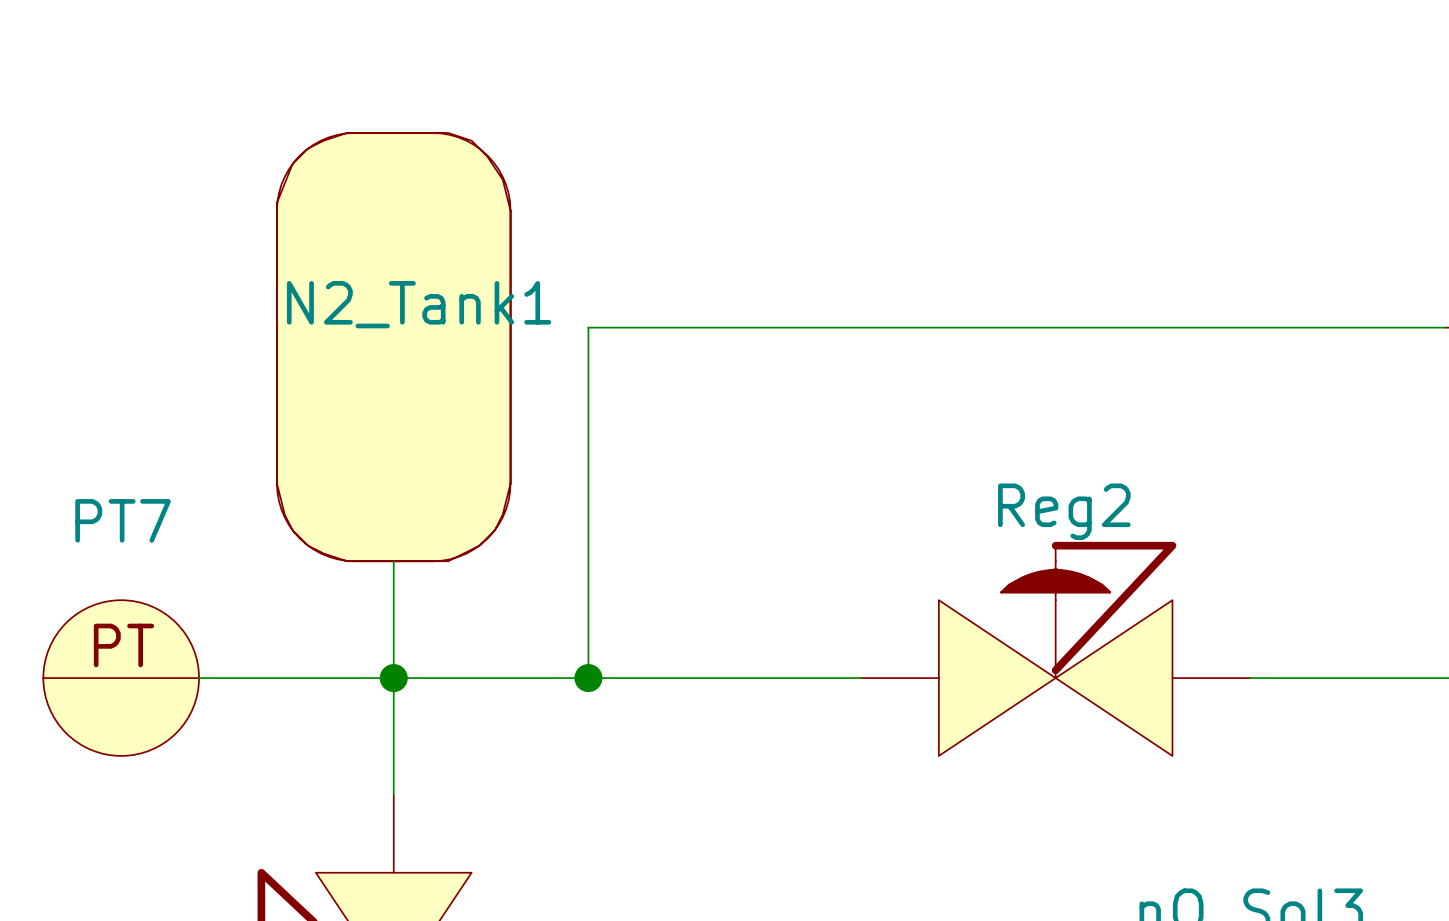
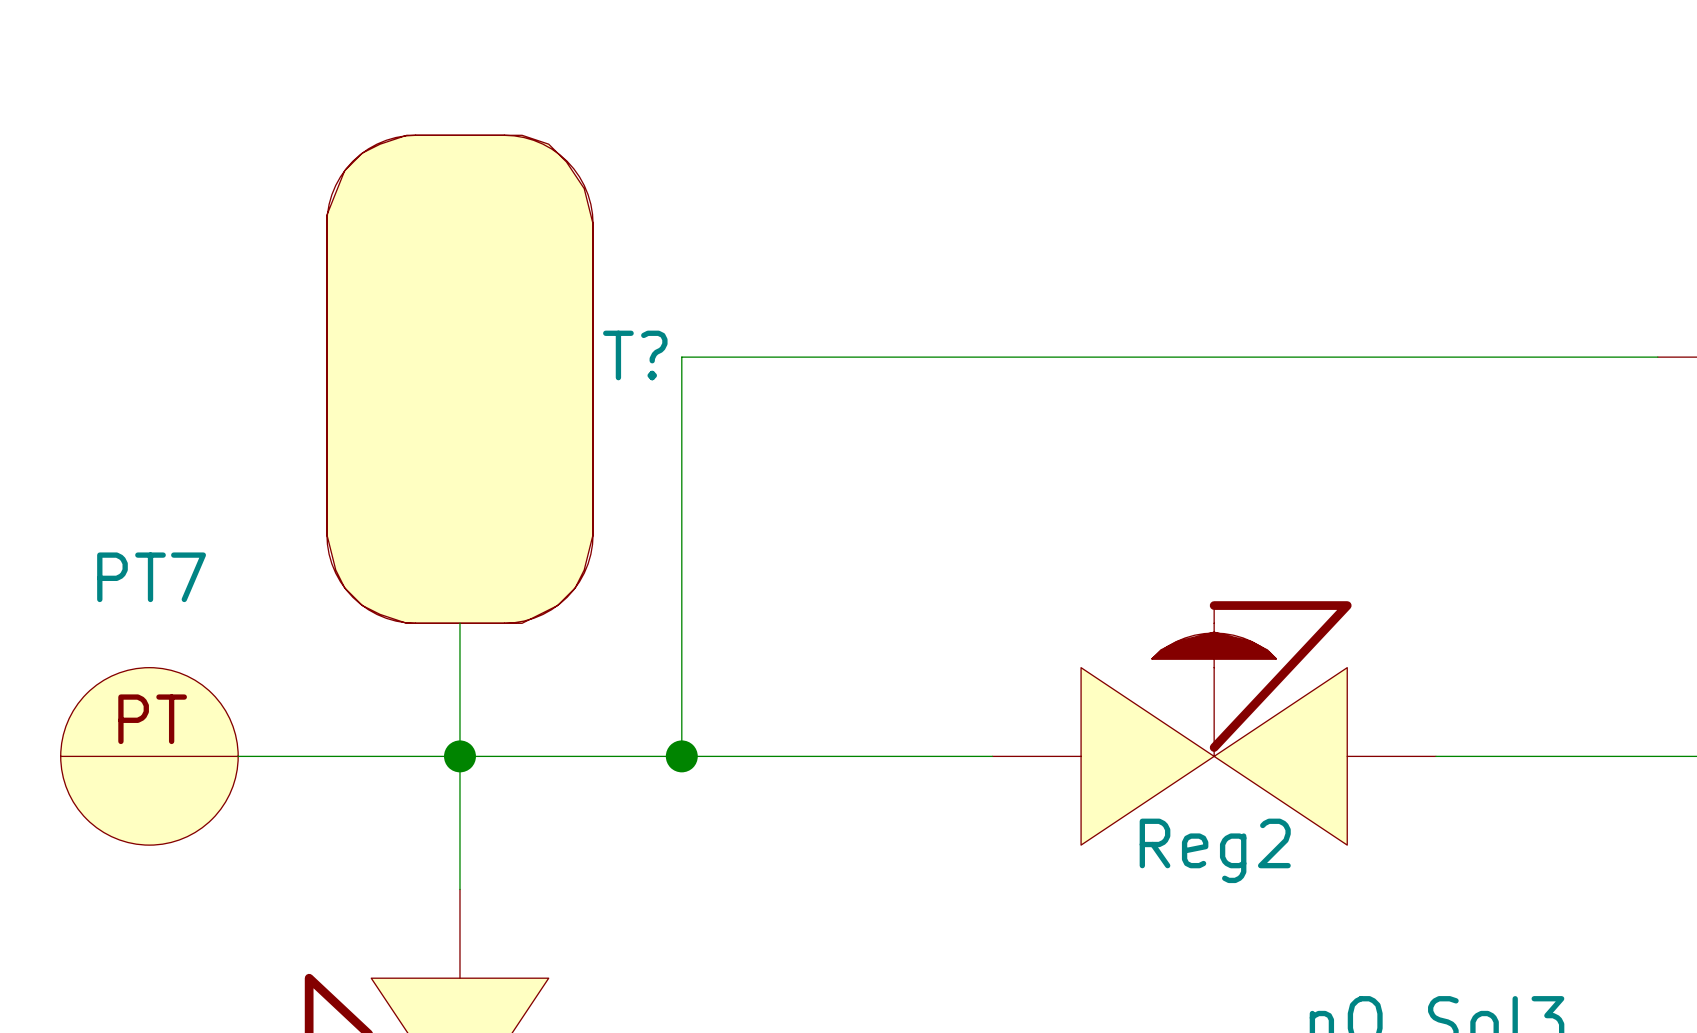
N2_Tank1 name: N2_Tank1 (419, 304) -> T? (635, 355)
Reg2 name position: Reg2 (1064, 511) -> Reg2 (1215, 850)

